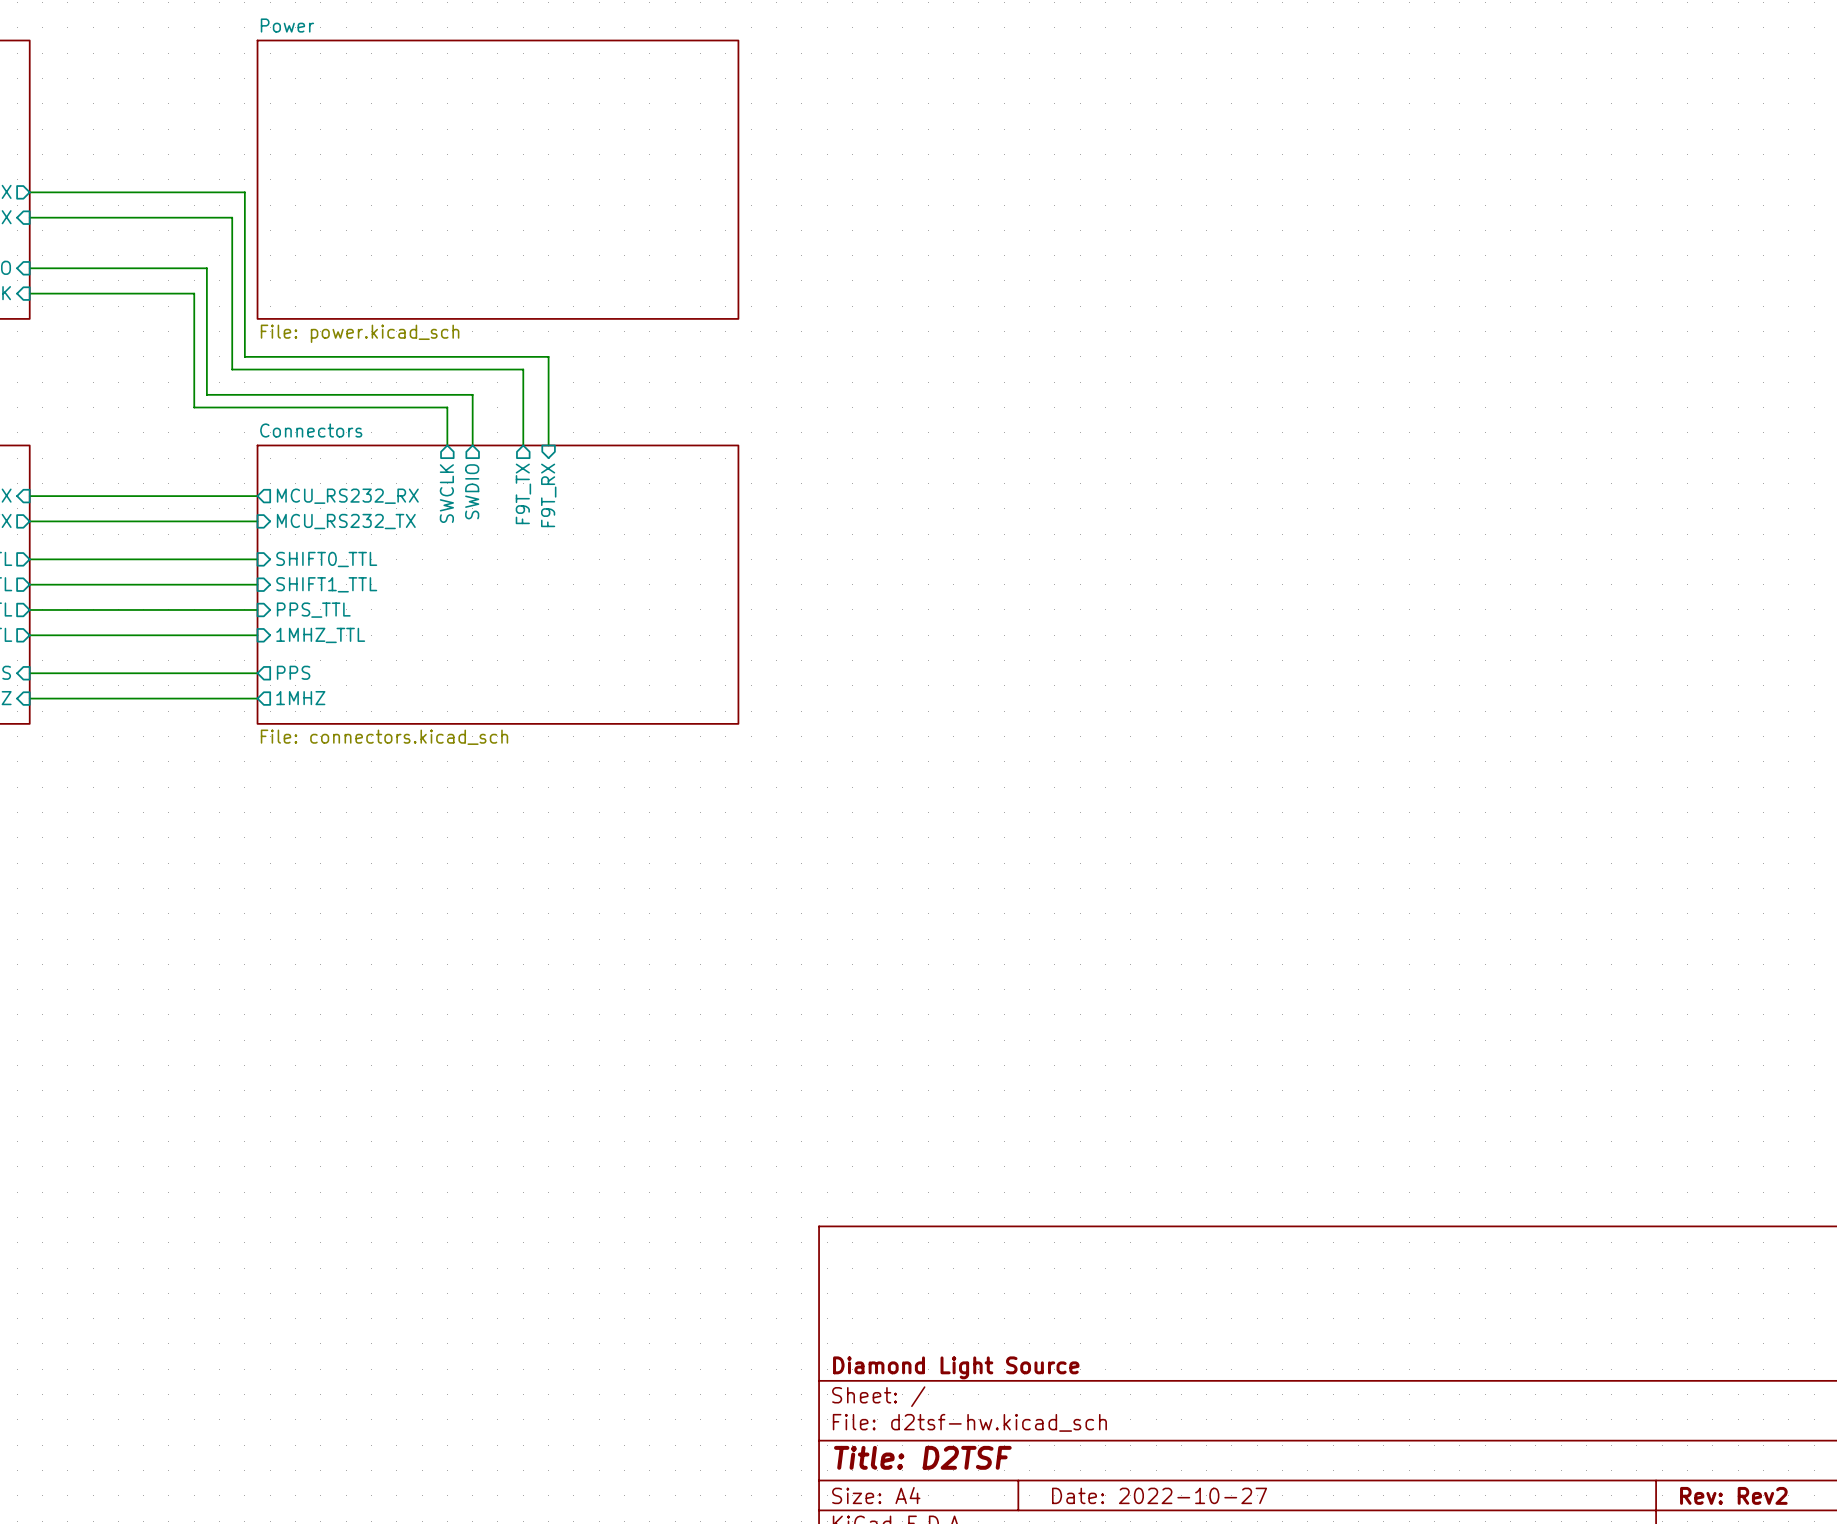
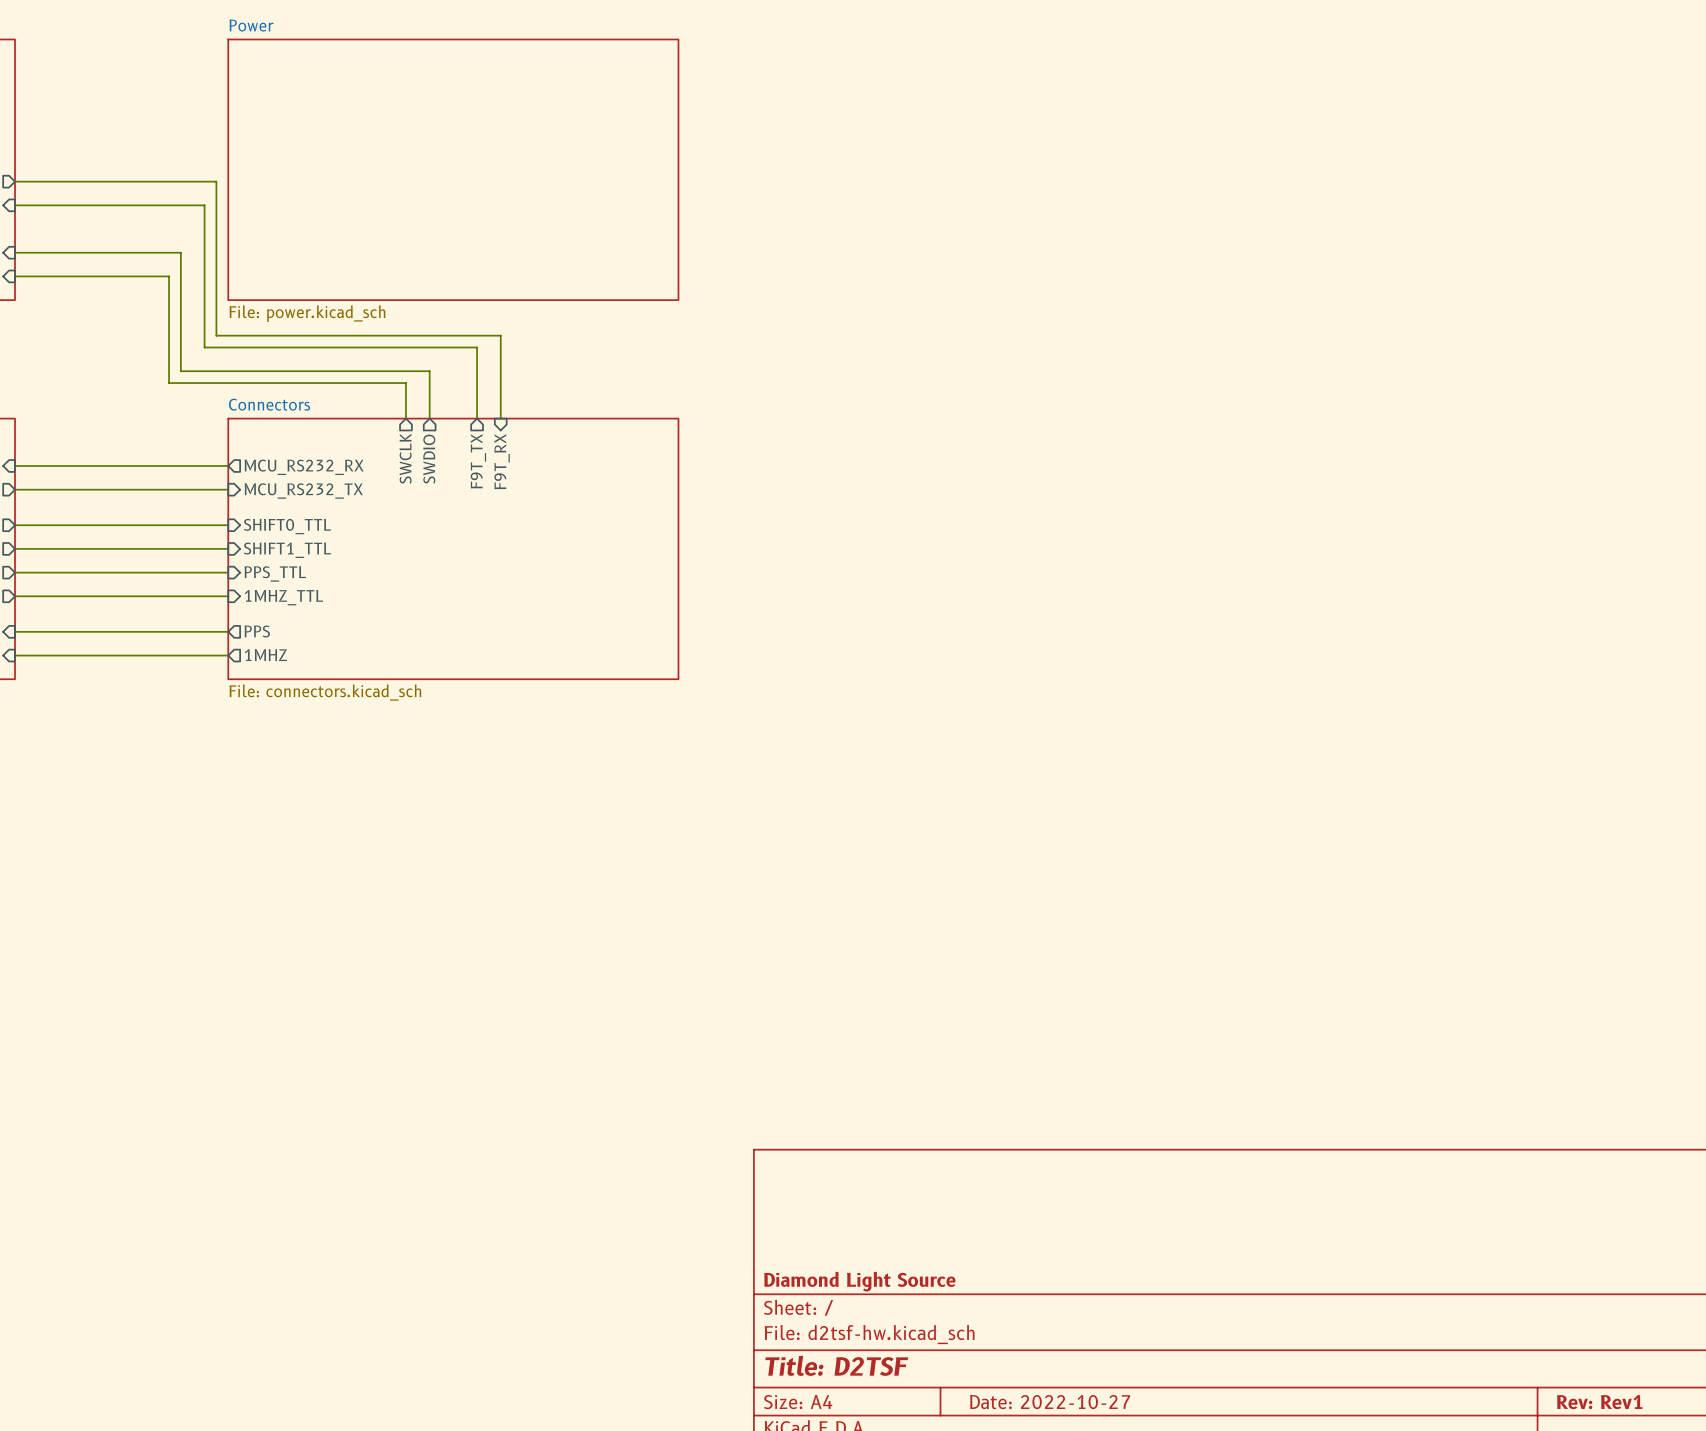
title block: Rev: Rev2 (1733, 1495) -> Rev: Rev1 (1599, 1402)

